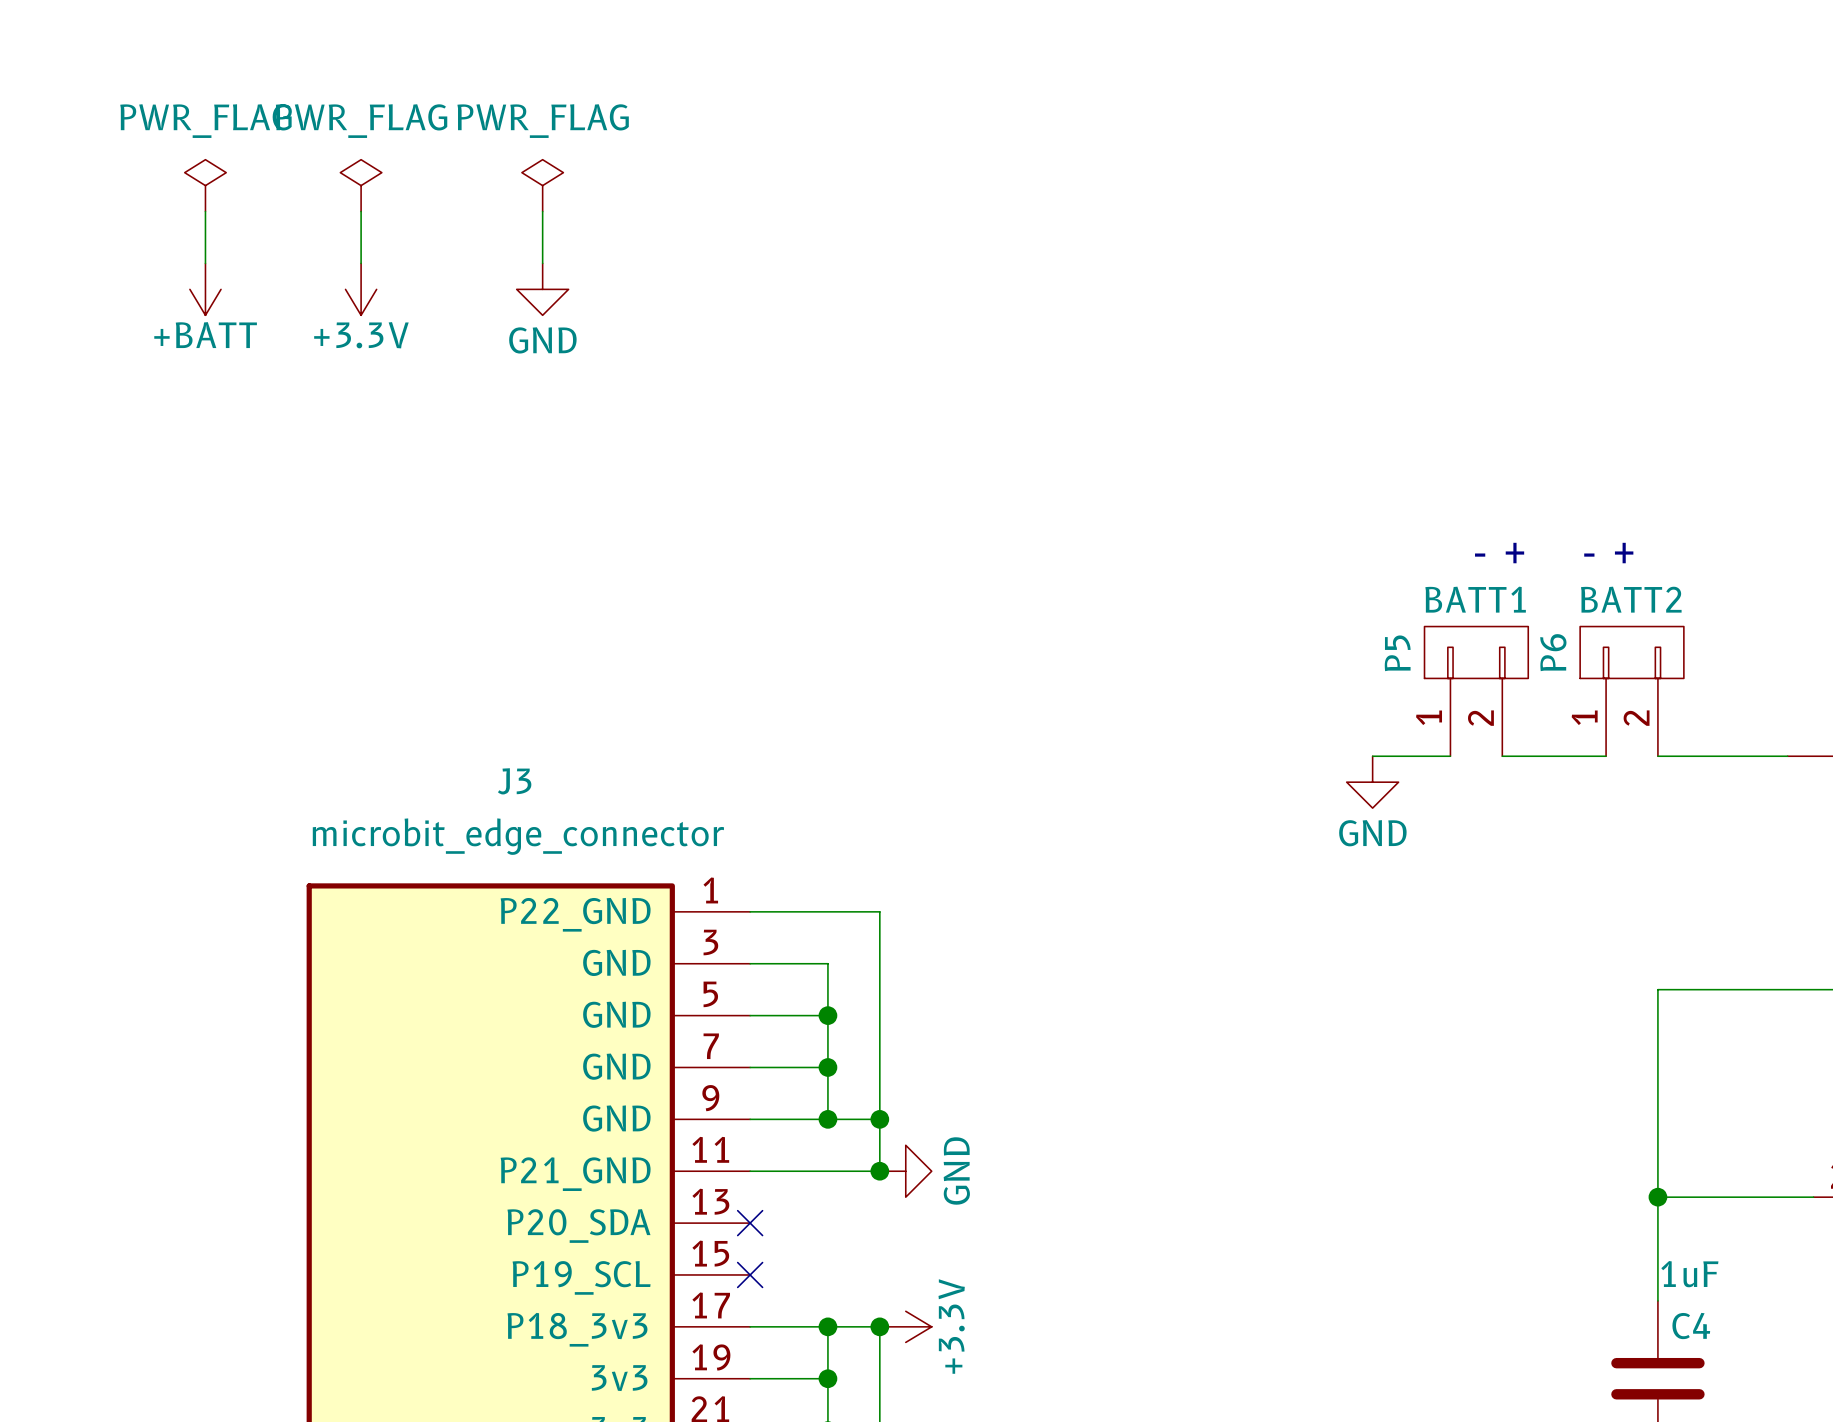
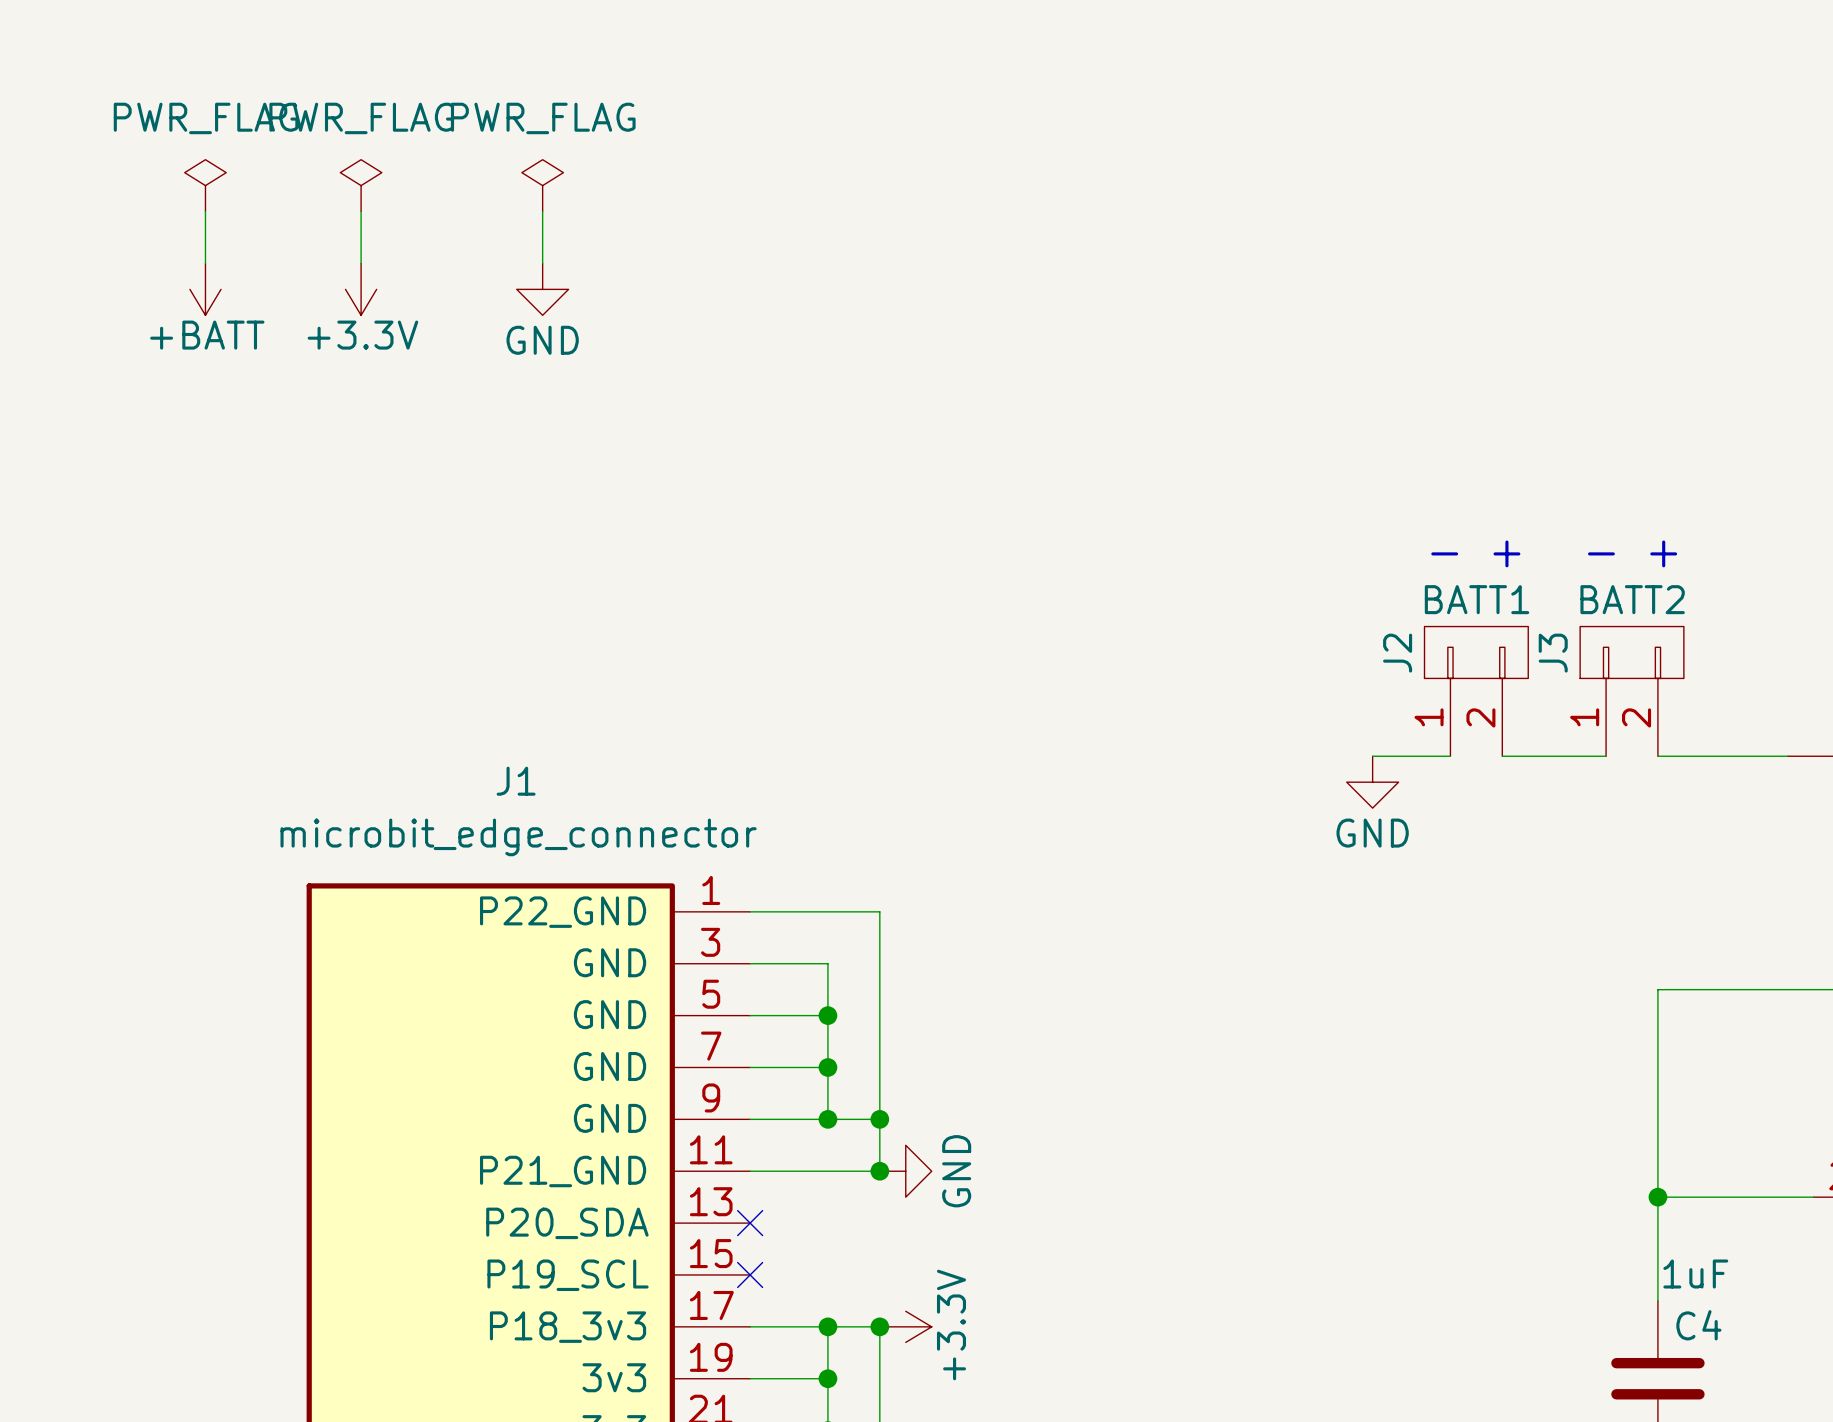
P6 name: P6 (1553, 652) -> J3 (1553, 653)
P5 name: P5 (1397, 653) -> J2 (1397, 653)
J3 name: J3 (514, 781) -> J1 (516, 781)

